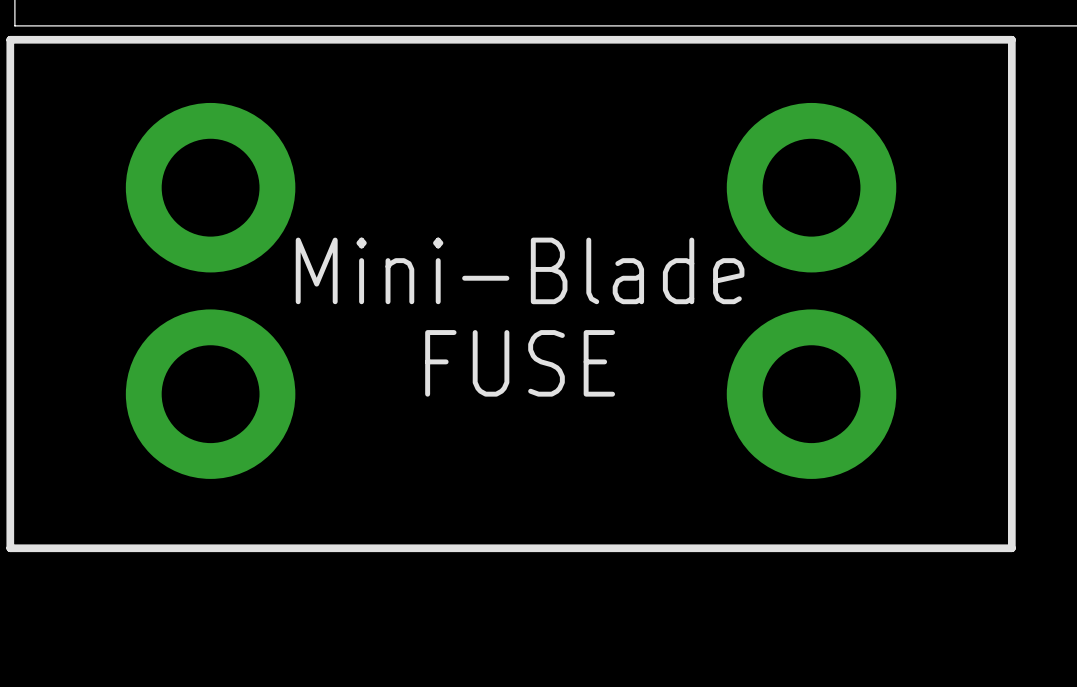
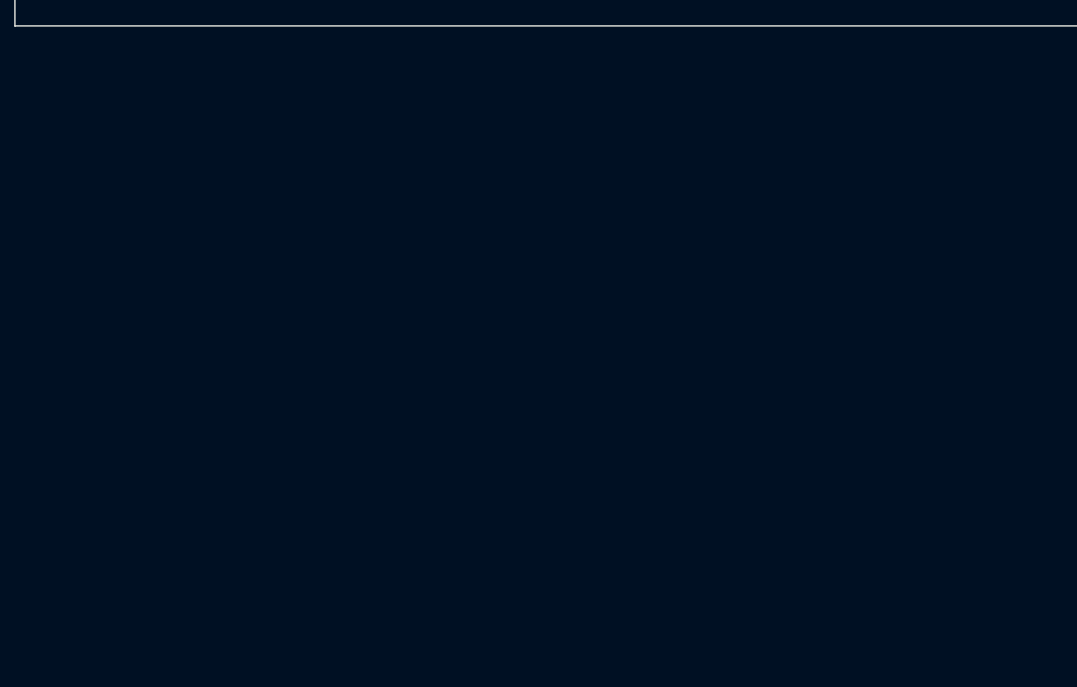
part: (511, 294) -> none

